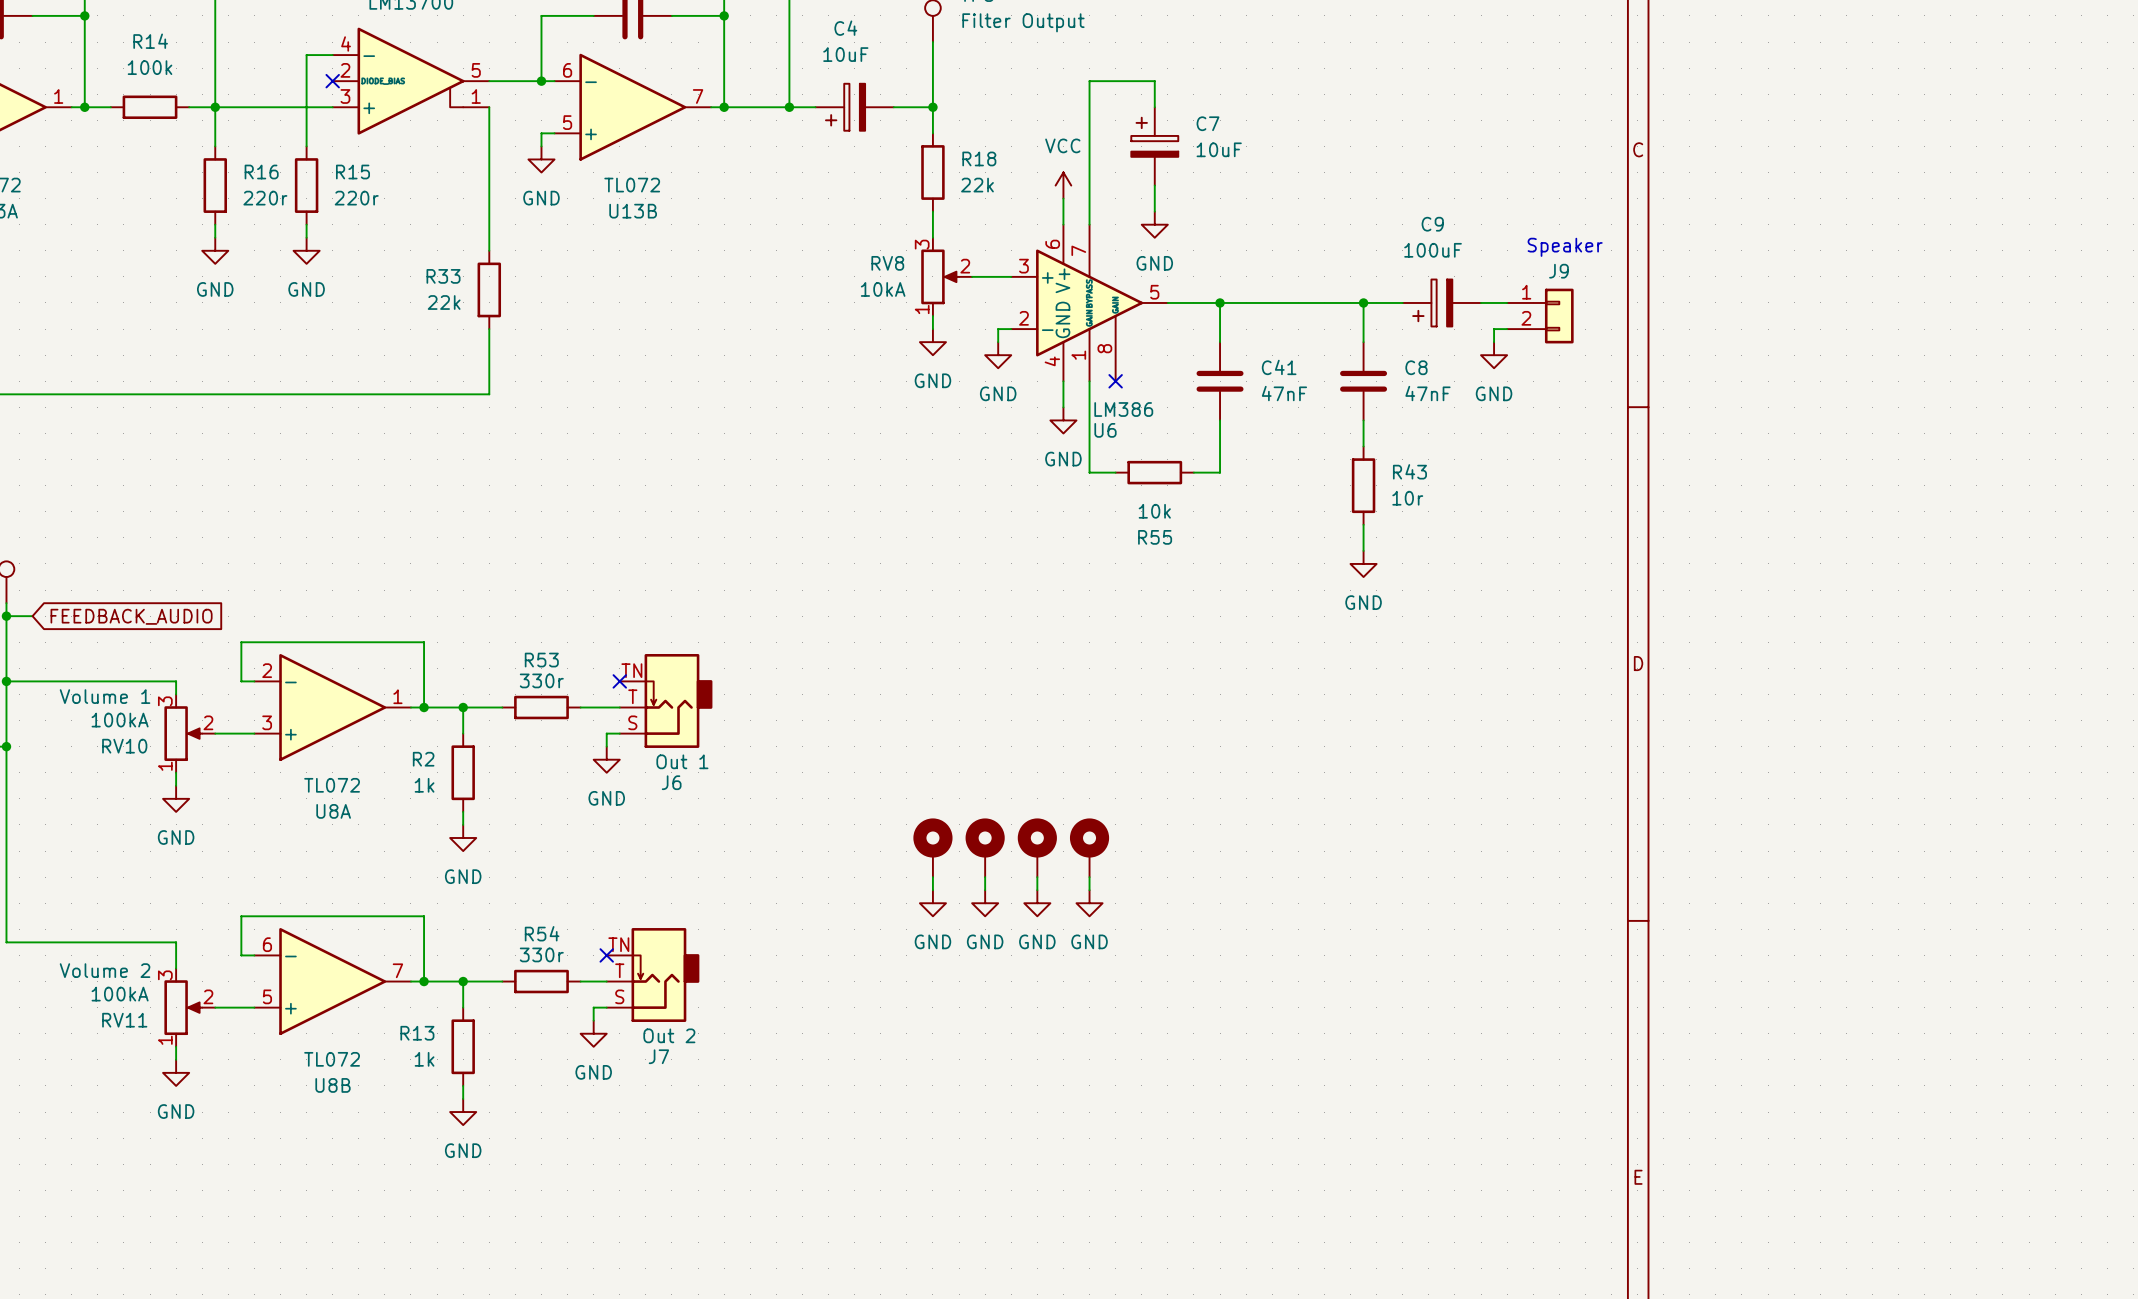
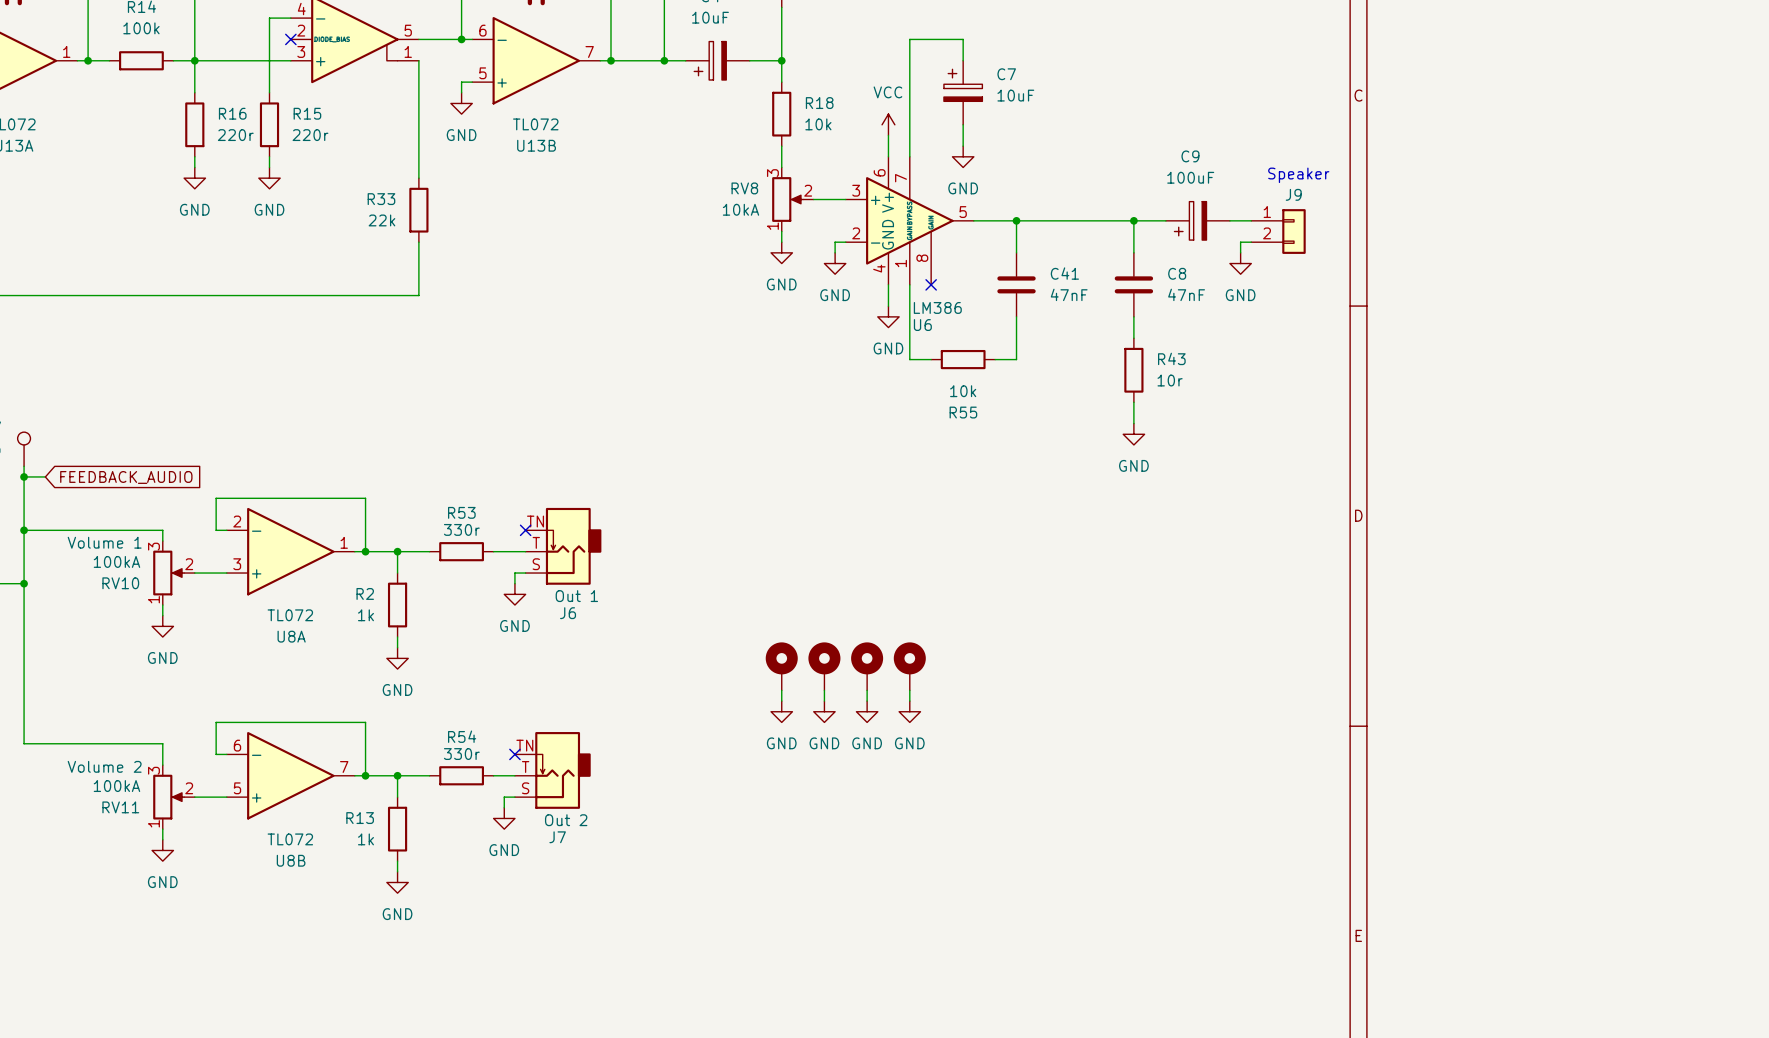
R18 value: 22k (977, 185) -> 10k (818, 124)

